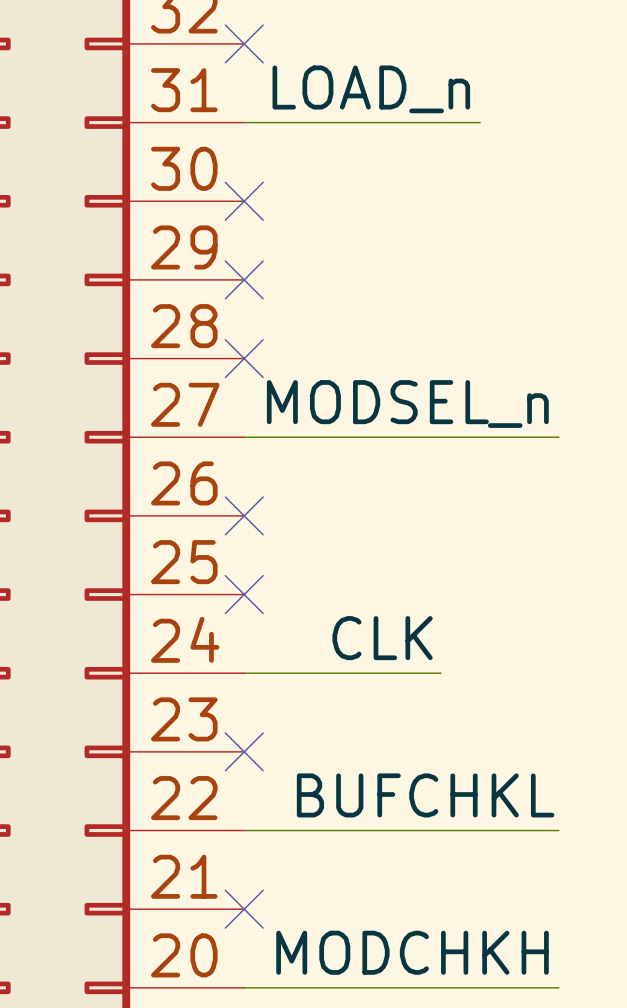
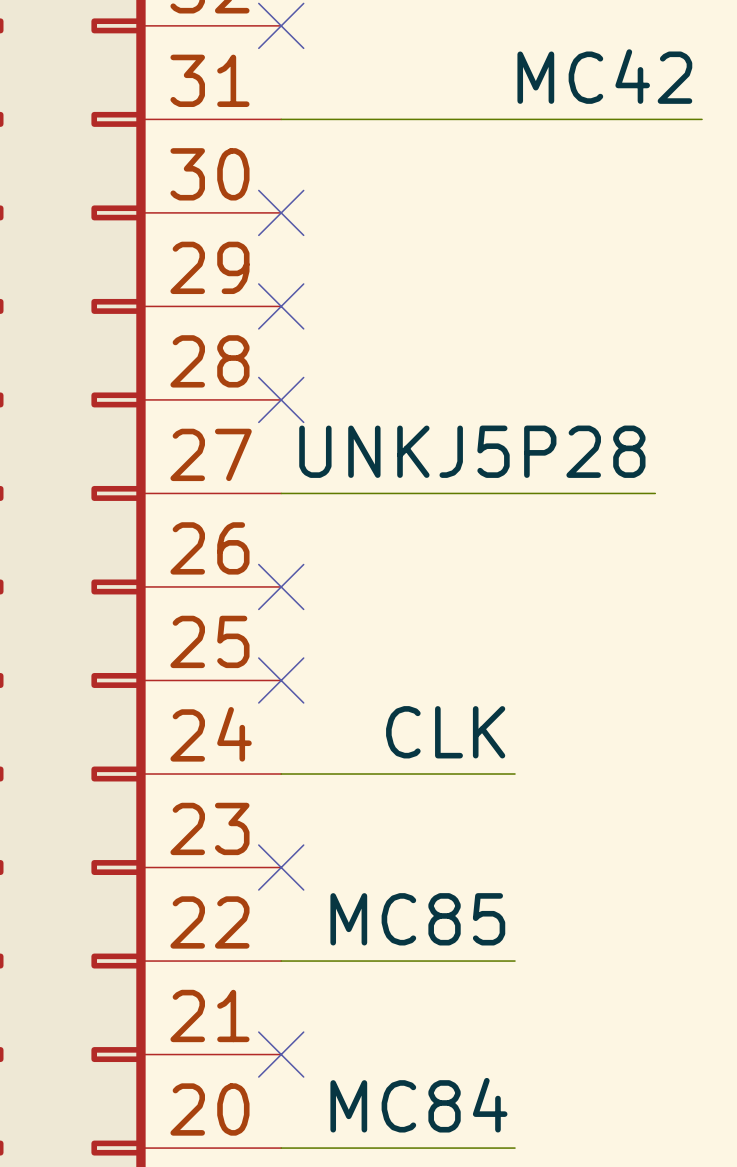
label: none -> MC42 (604, 76)
label: LOAD_n (371, 89) -> none
label: MODSEL_n (407, 404) -> UNKJ5P28 (472, 451)
label: none -> MC85 (417, 919)
label: BUFCHKL (425, 795) -> none
wire: (440, 830) (558, 830) -> (561, 119) (702, 119)
label: none -> MC84 (418, 1105)
label: MODCHKH (412, 952) -> none
wire: (440, 987) (558, 987) -> none

